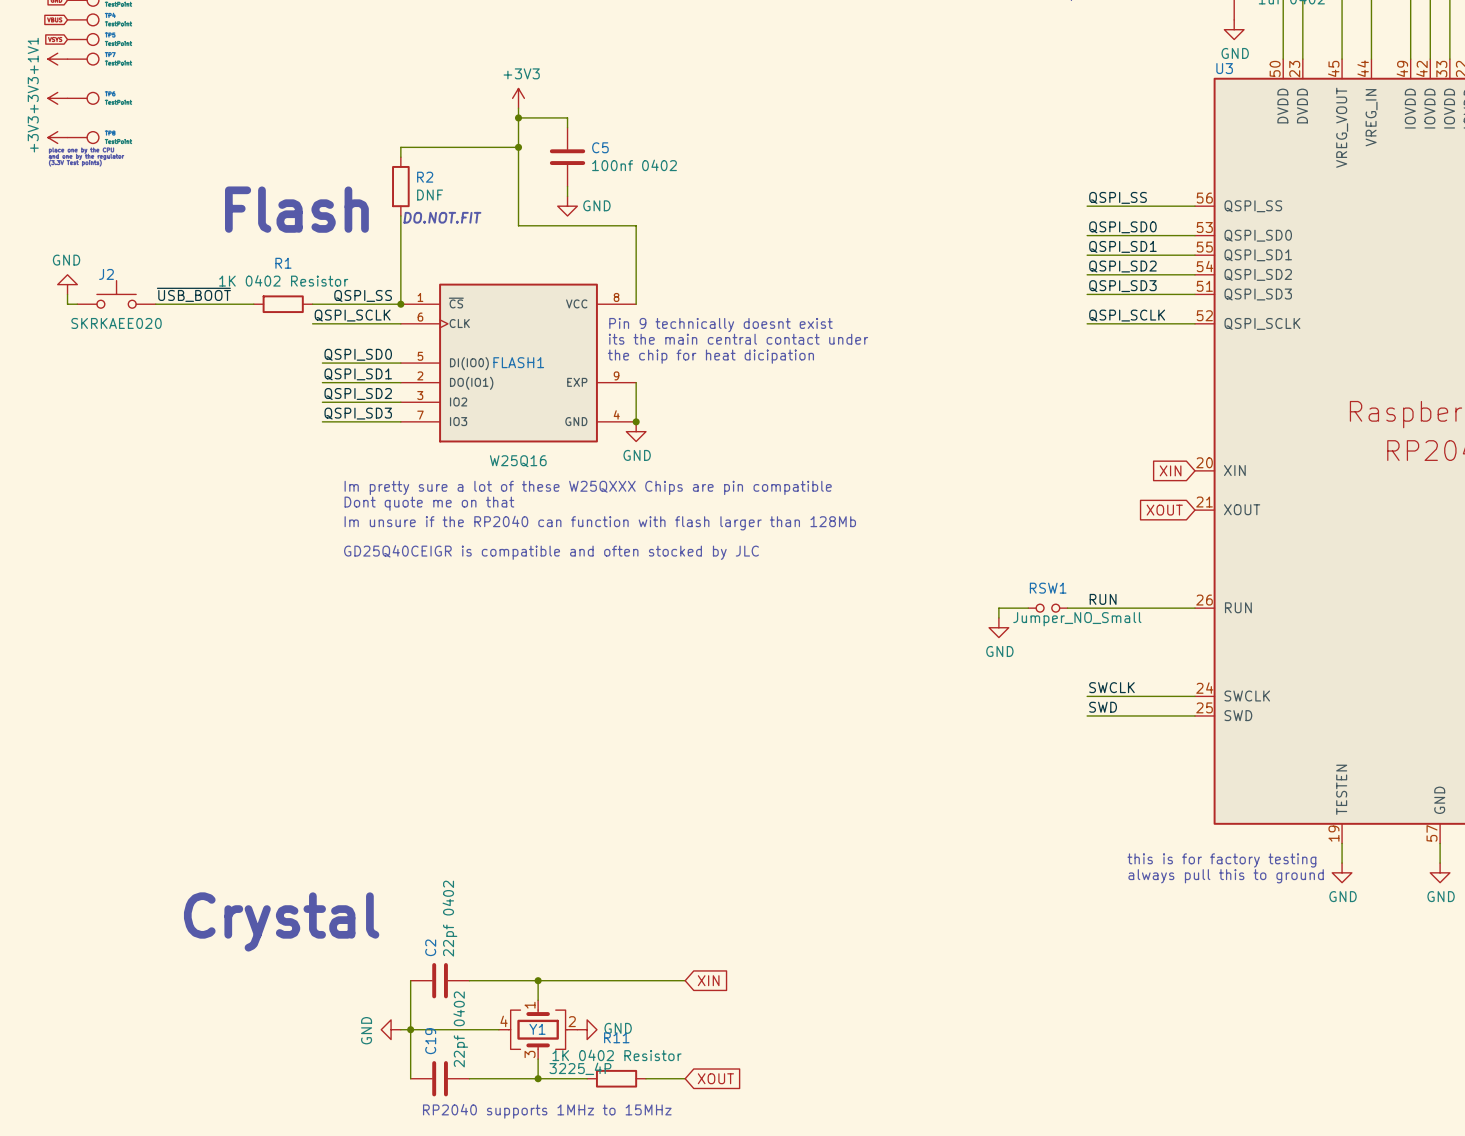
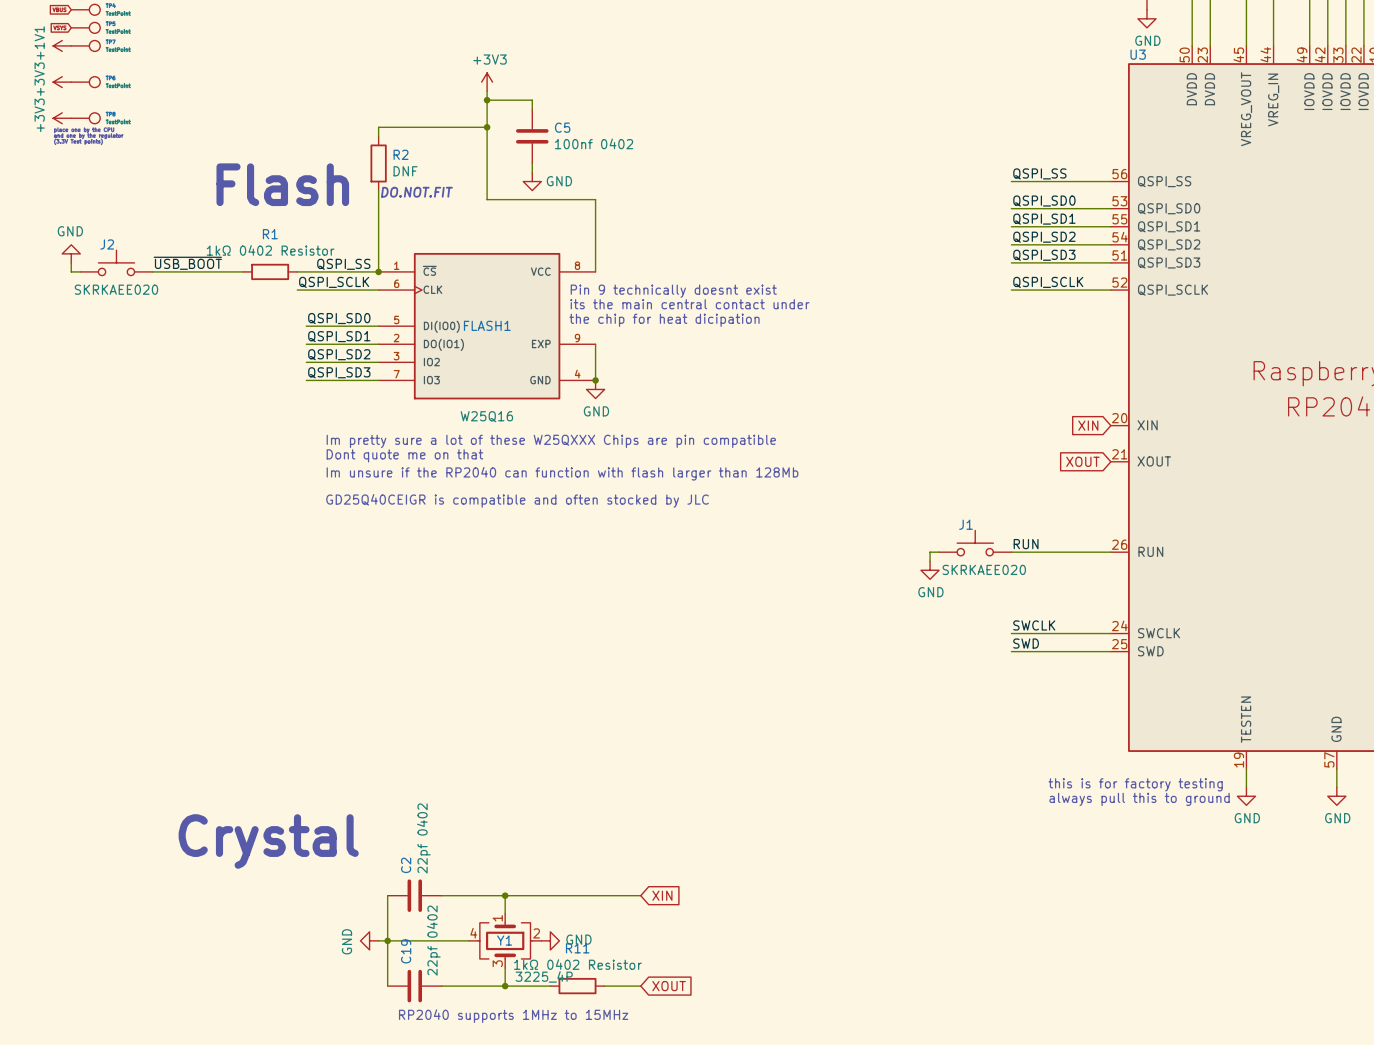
R1 value: 1K 0402 Resistor (283, 280) -> 1kΩ 0402 Resistor (270, 250)
J1: none -> SKRKAEE020 (975, 543)
RSW1: Jumper_NO_Small (1047, 608) -> none
R11 value: 1K 0402 Resistor (617, 1055) -> 1kΩ 0402 Resistor (577, 964)

